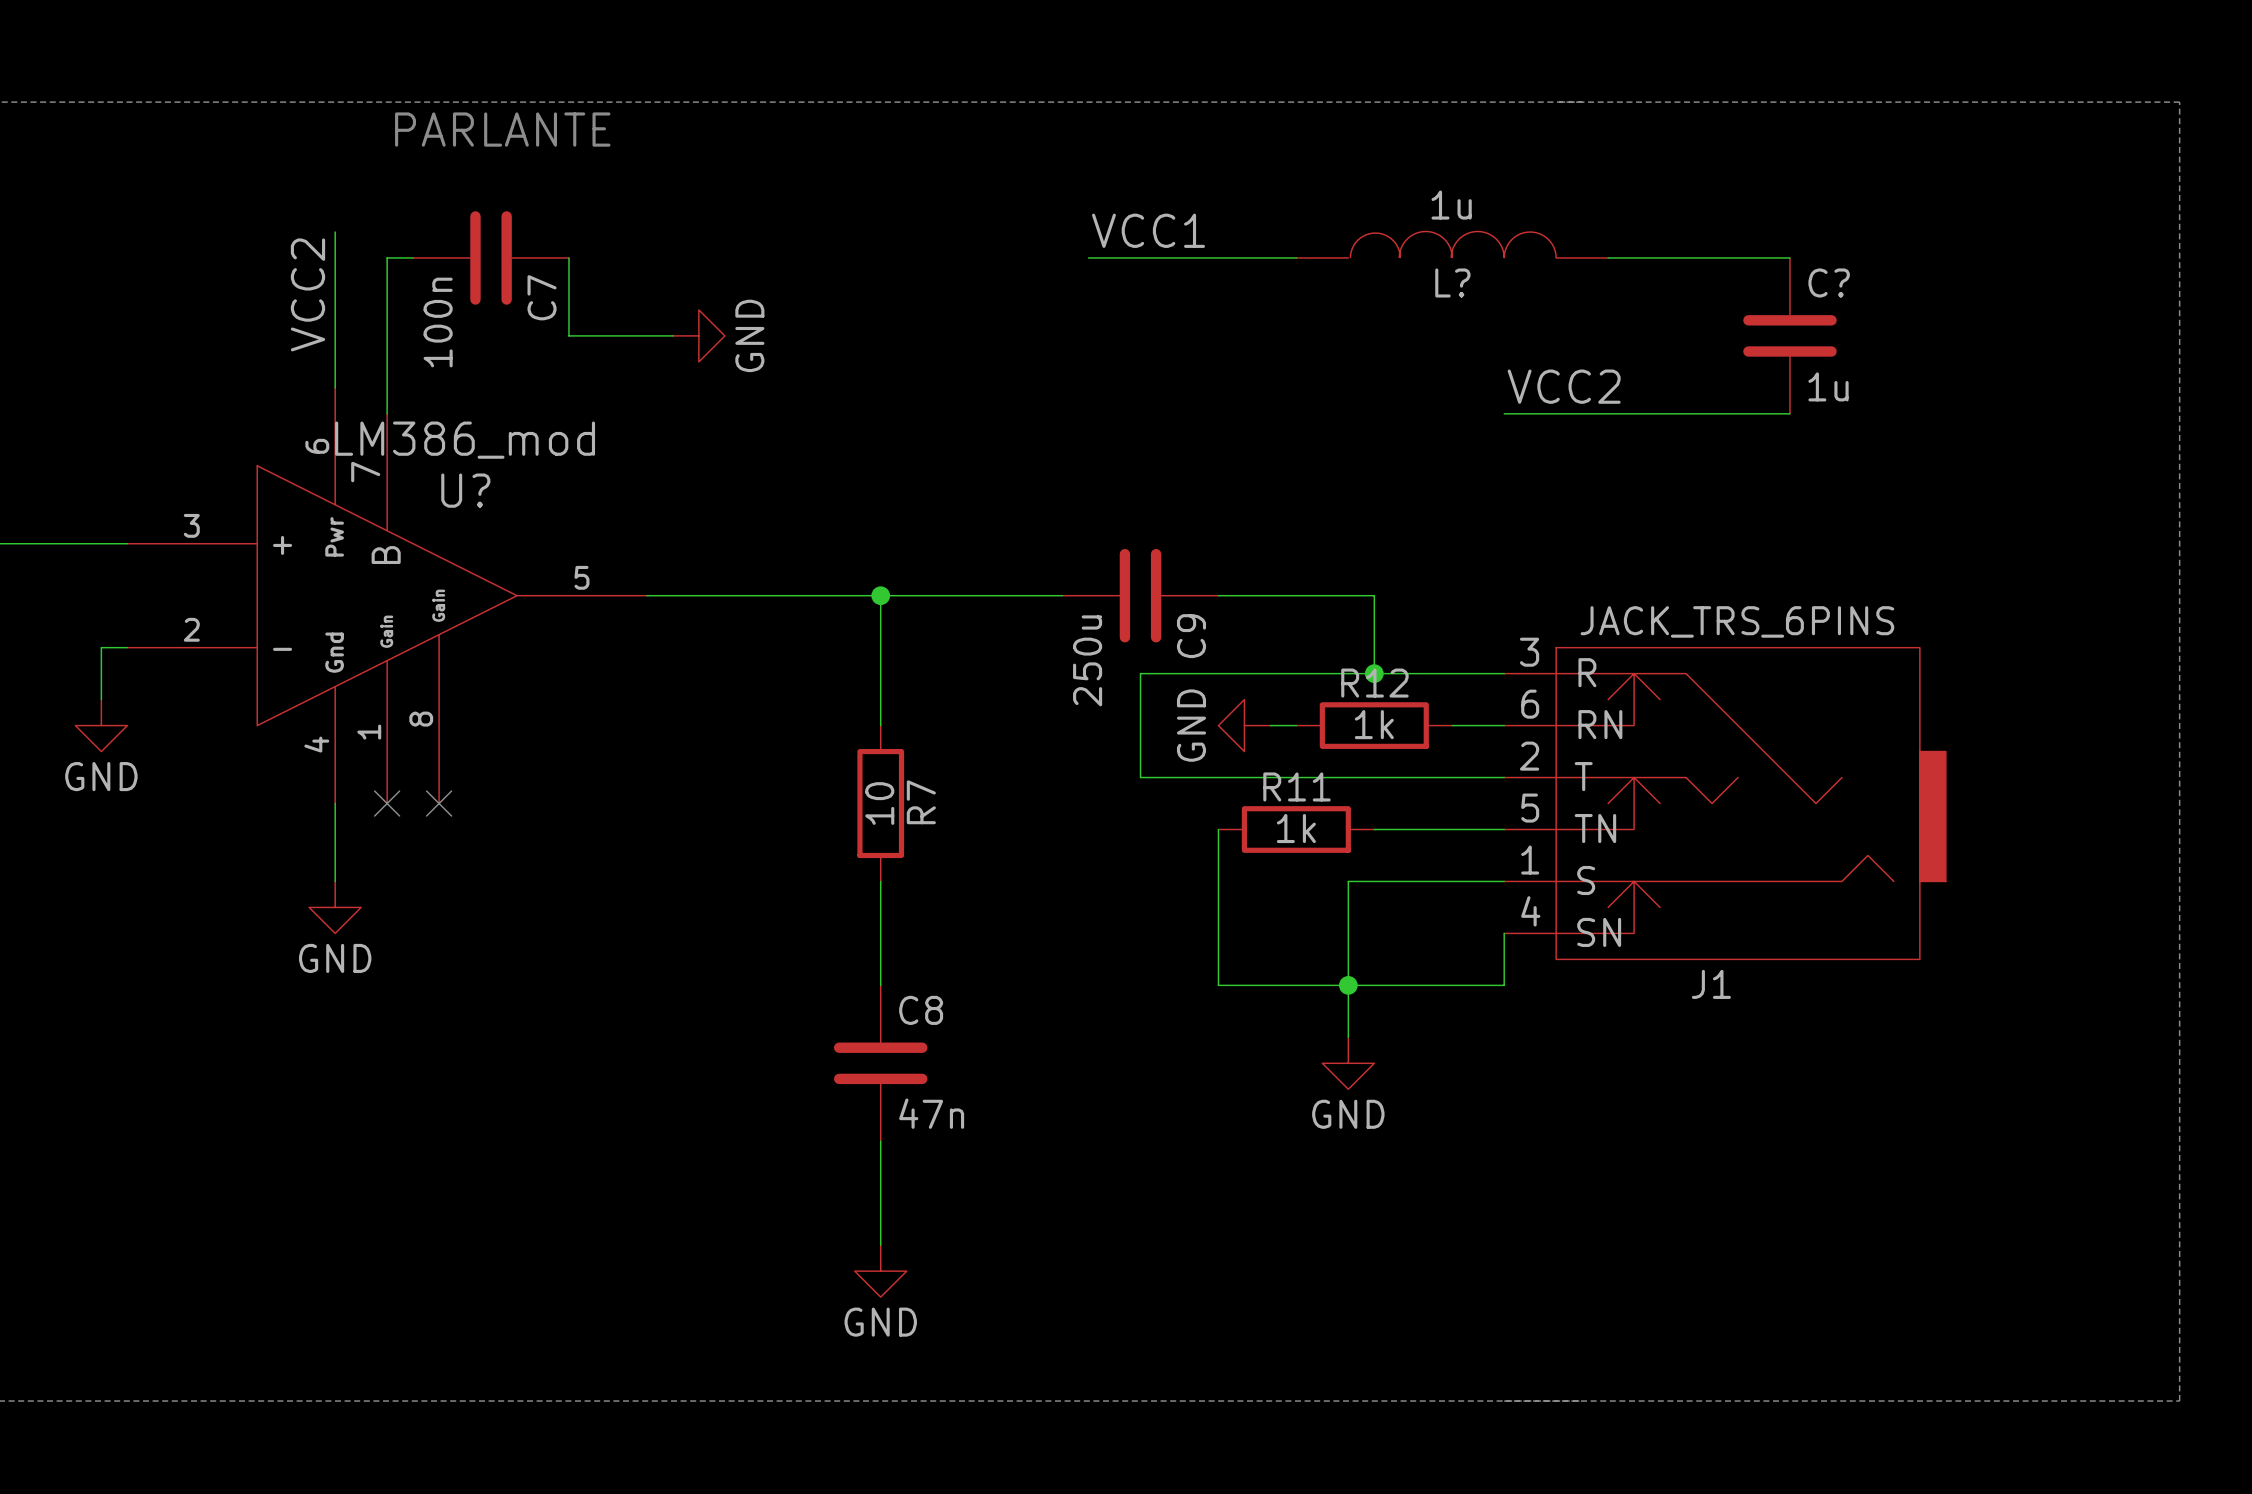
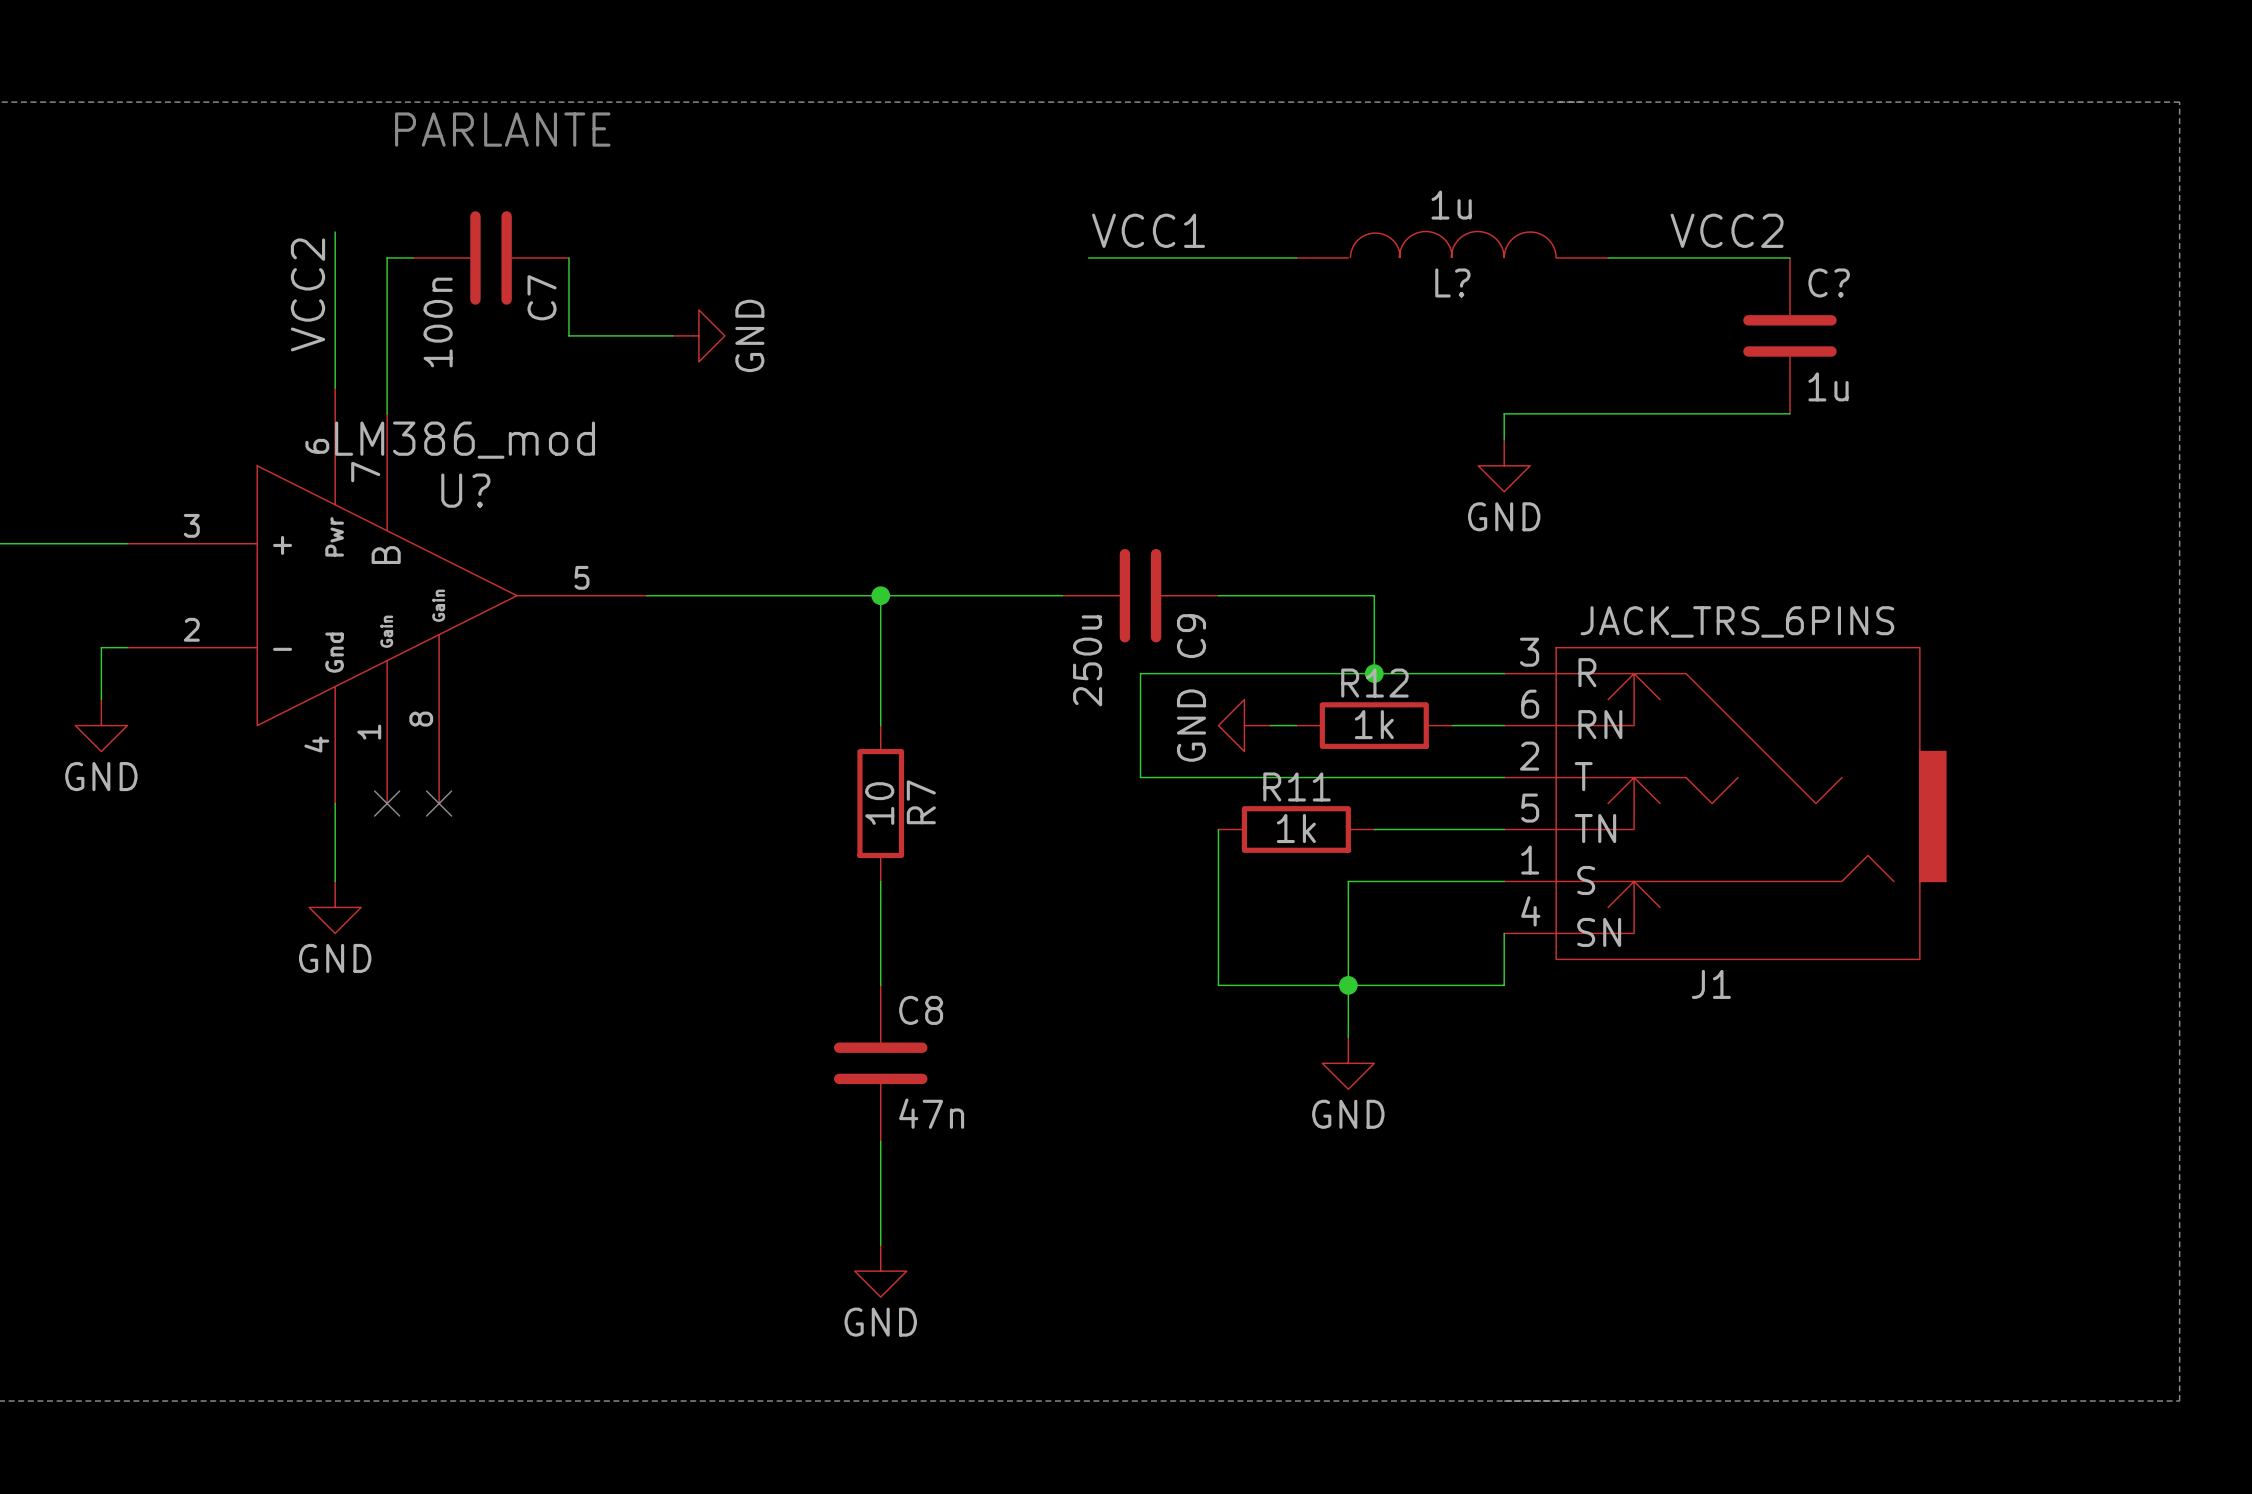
label position: VCC2 (1564, 386) -> VCC2 (1727, 230)
wire: none -> (1504, 413) (1504, 439)
power symbol: none -> GND (1504, 465)

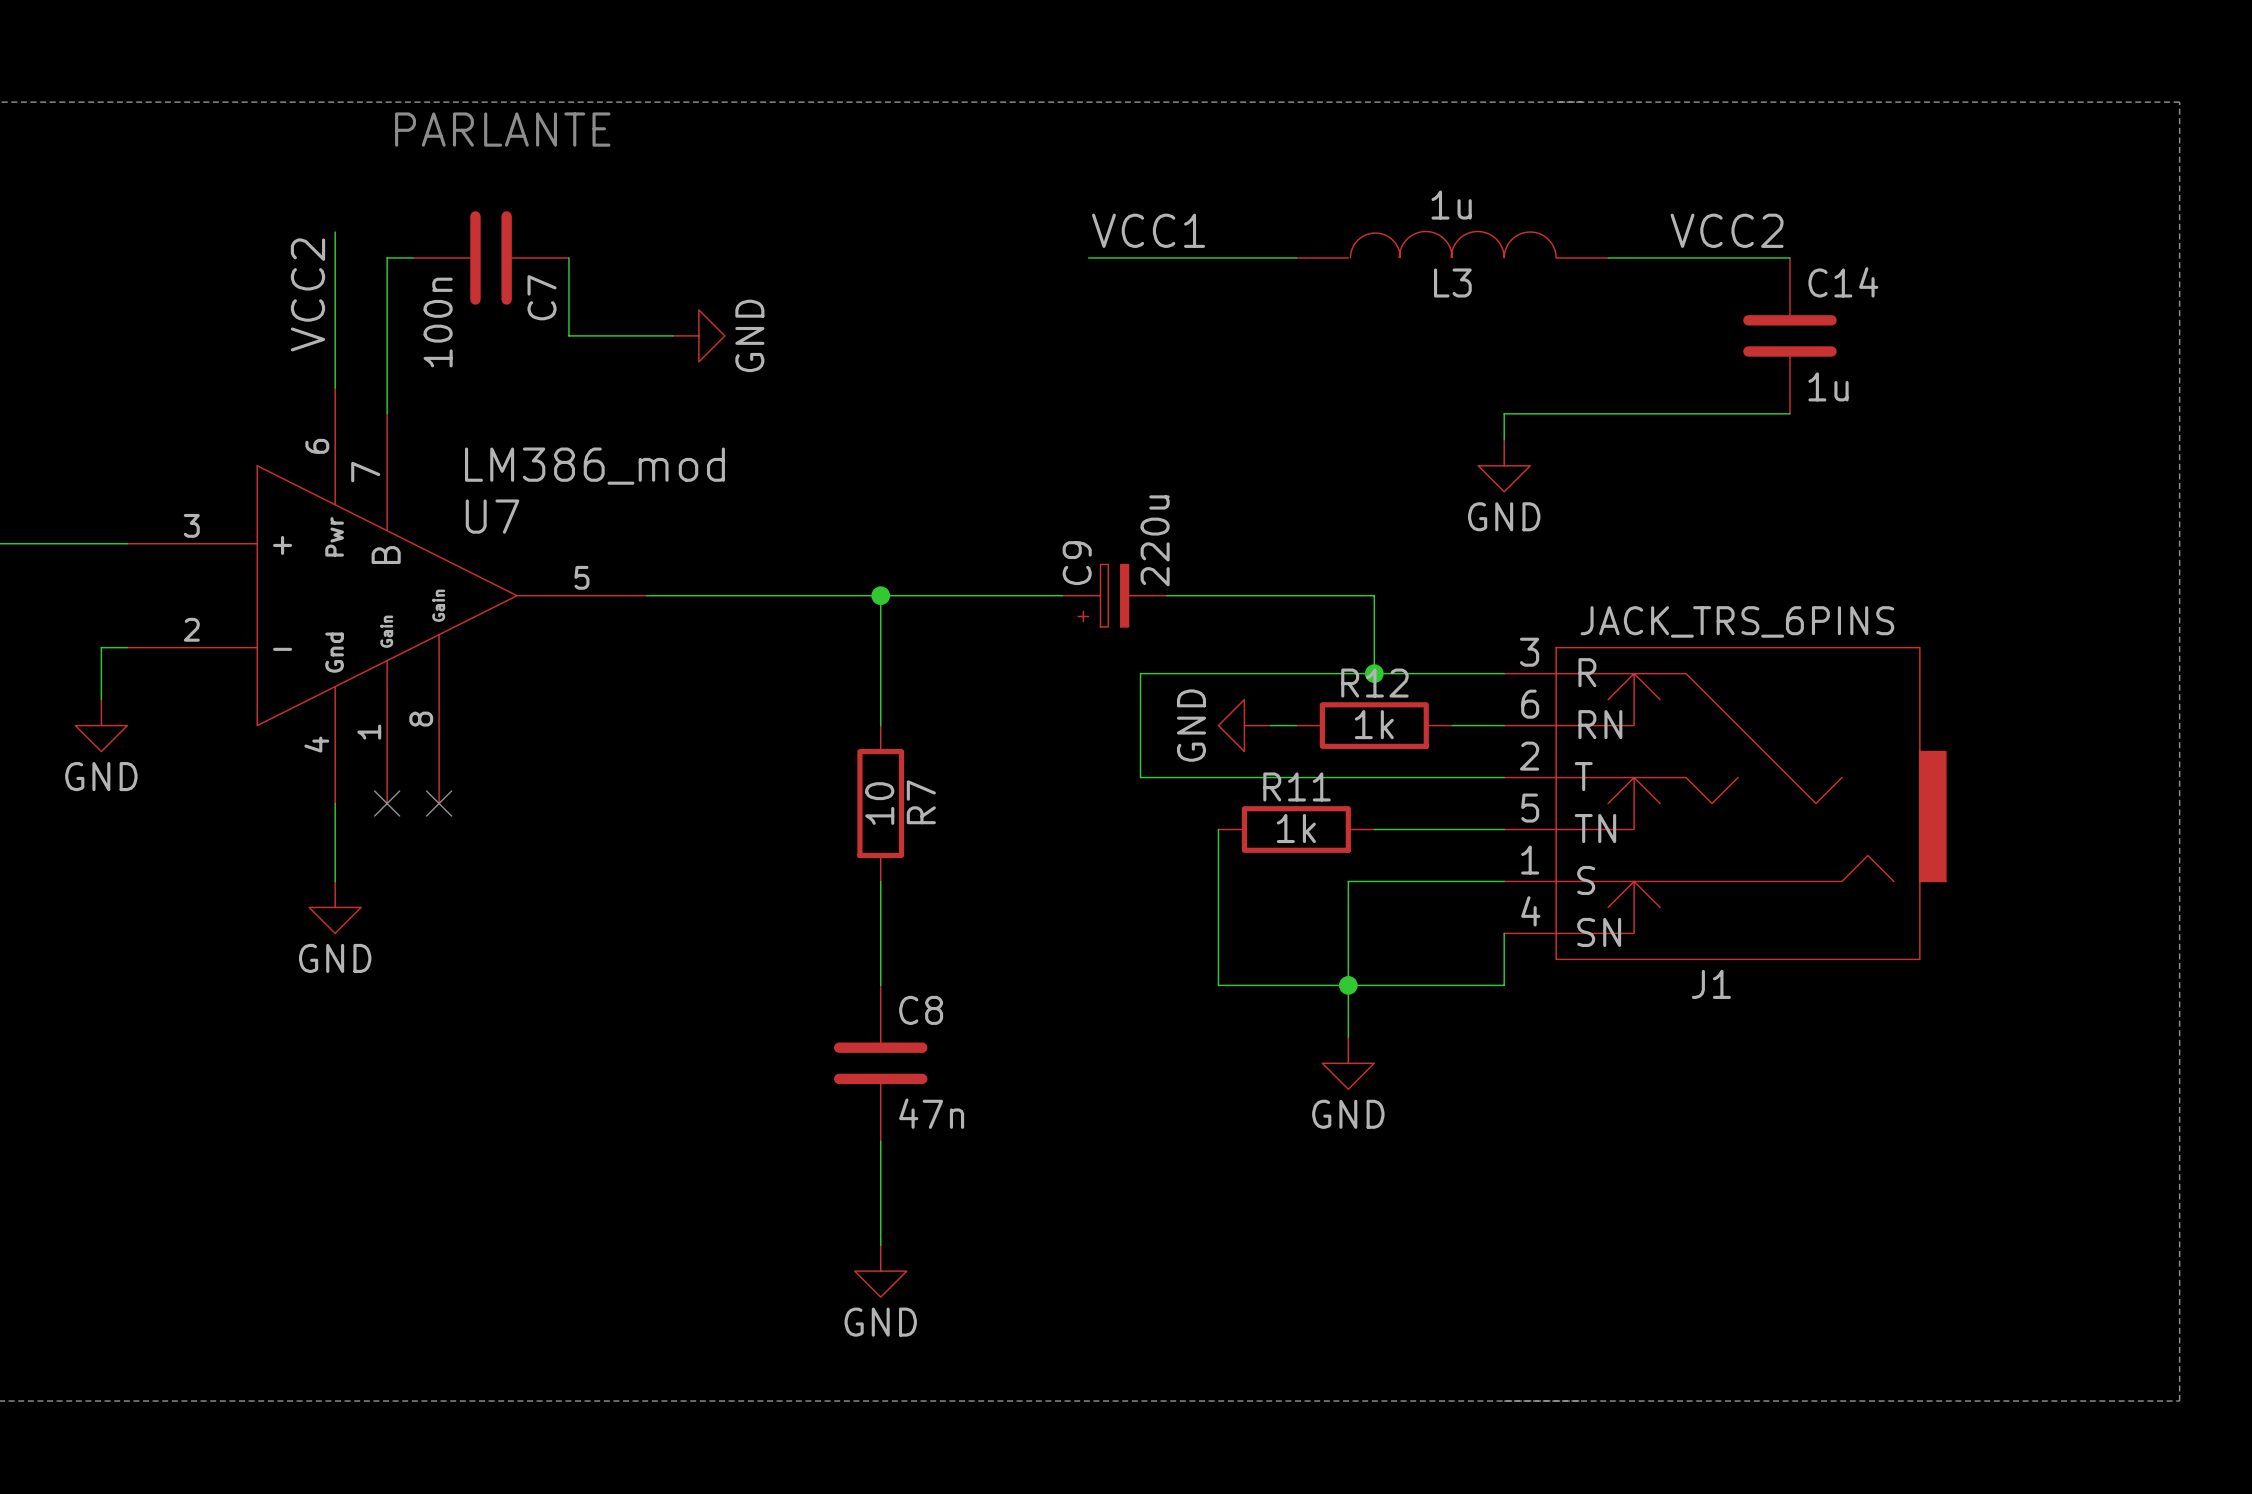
L? name: L? (1452, 282) -> L3 (1452, 282)
C? name: C? (1829, 282) -> C14 (1843, 282)
U? value position: LM386_mod (465, 440) -> LM386_mod (594, 466)
U? name: U? (465, 490) -> U7 (492, 516)
C9 symbol: [1062, 548, 1219, 643] -> [1062, 564, 1167, 627]
C9 name position: C9 (1191, 636) -> C9 (1077, 563)
C9 value: 250u (1087, 660) -> 220u (1155, 540)

